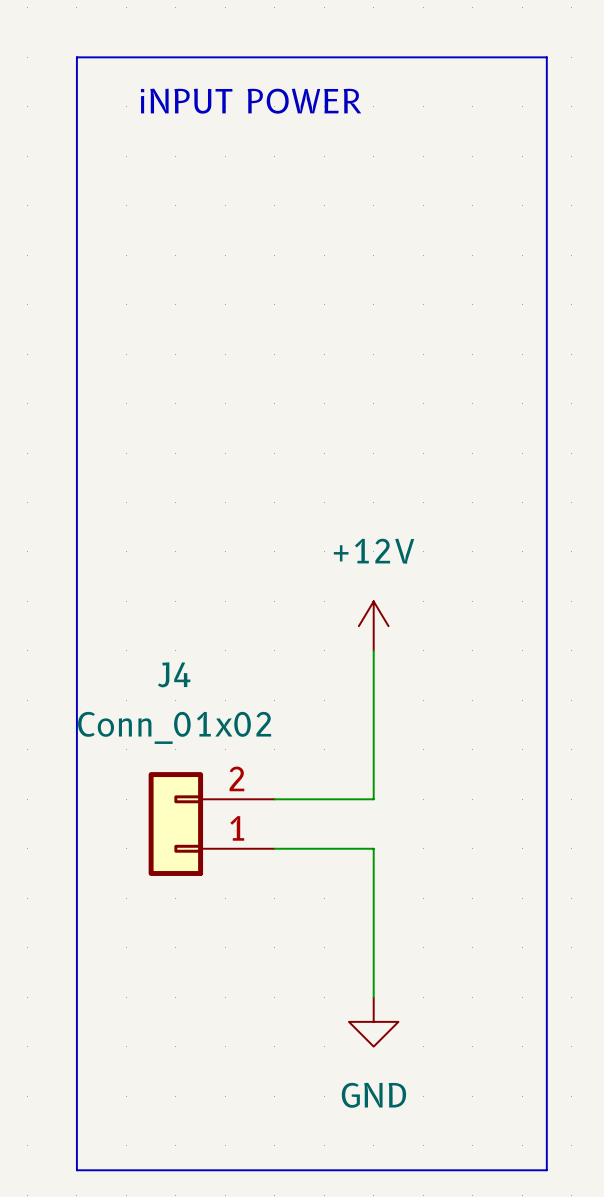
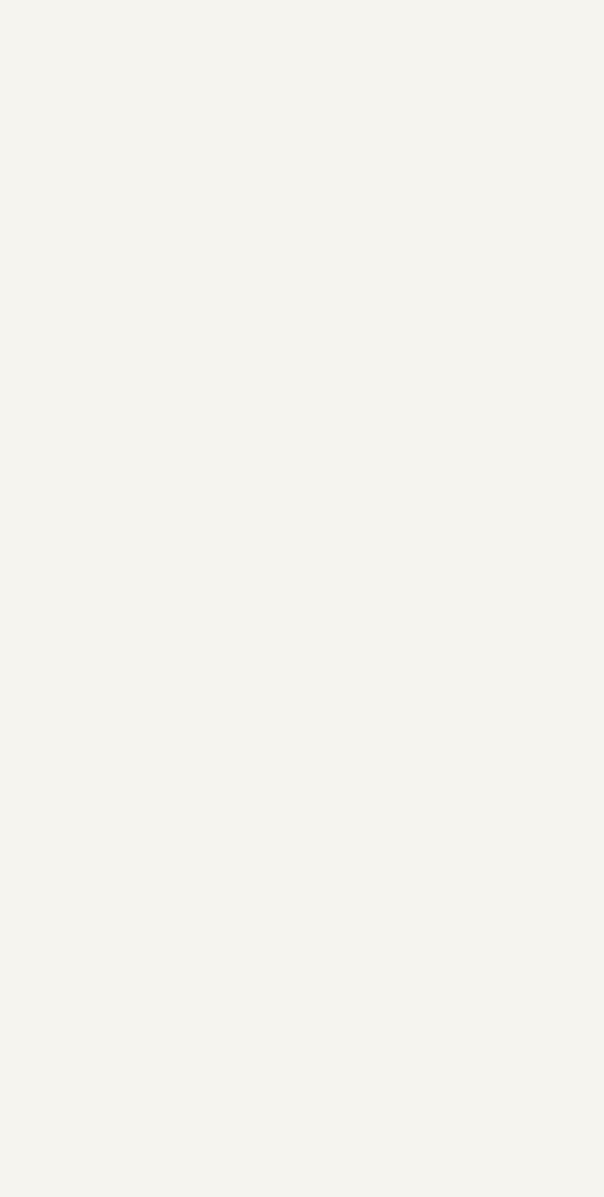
line: (76, 57) (546, 57) (546, 1170) (76, 1170) (76, 57) -> none
text: iNPUT POWER (251, 101) -> none
power symbol: +12V (373, 626) -> none
wire: (373, 650) (373, 799) (274, 799) -> none
J4: Conn_01x02 (211, 824) -> none
wire: (274, 848) (373, 848) (373, 997) -> none
power symbol: GND (373, 1021) -> none

